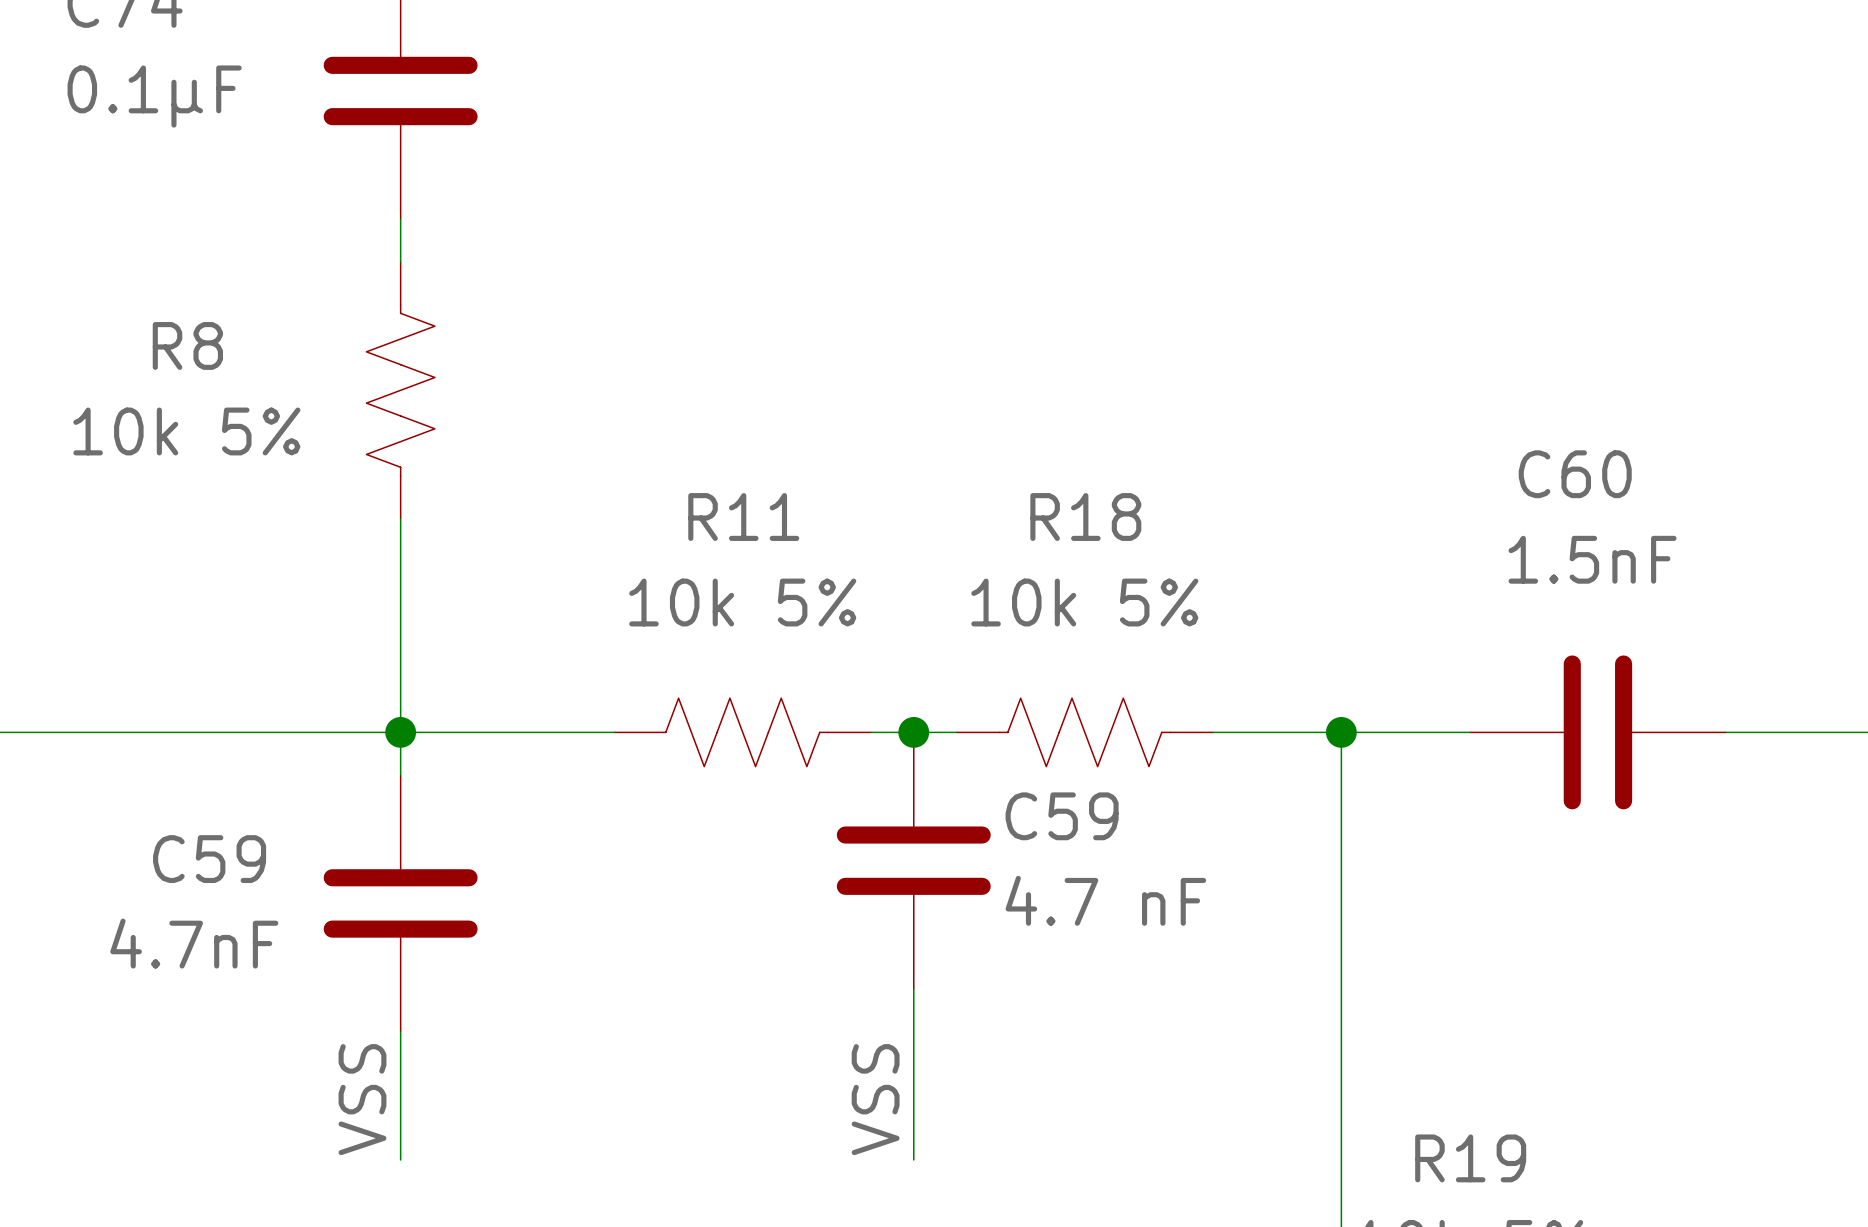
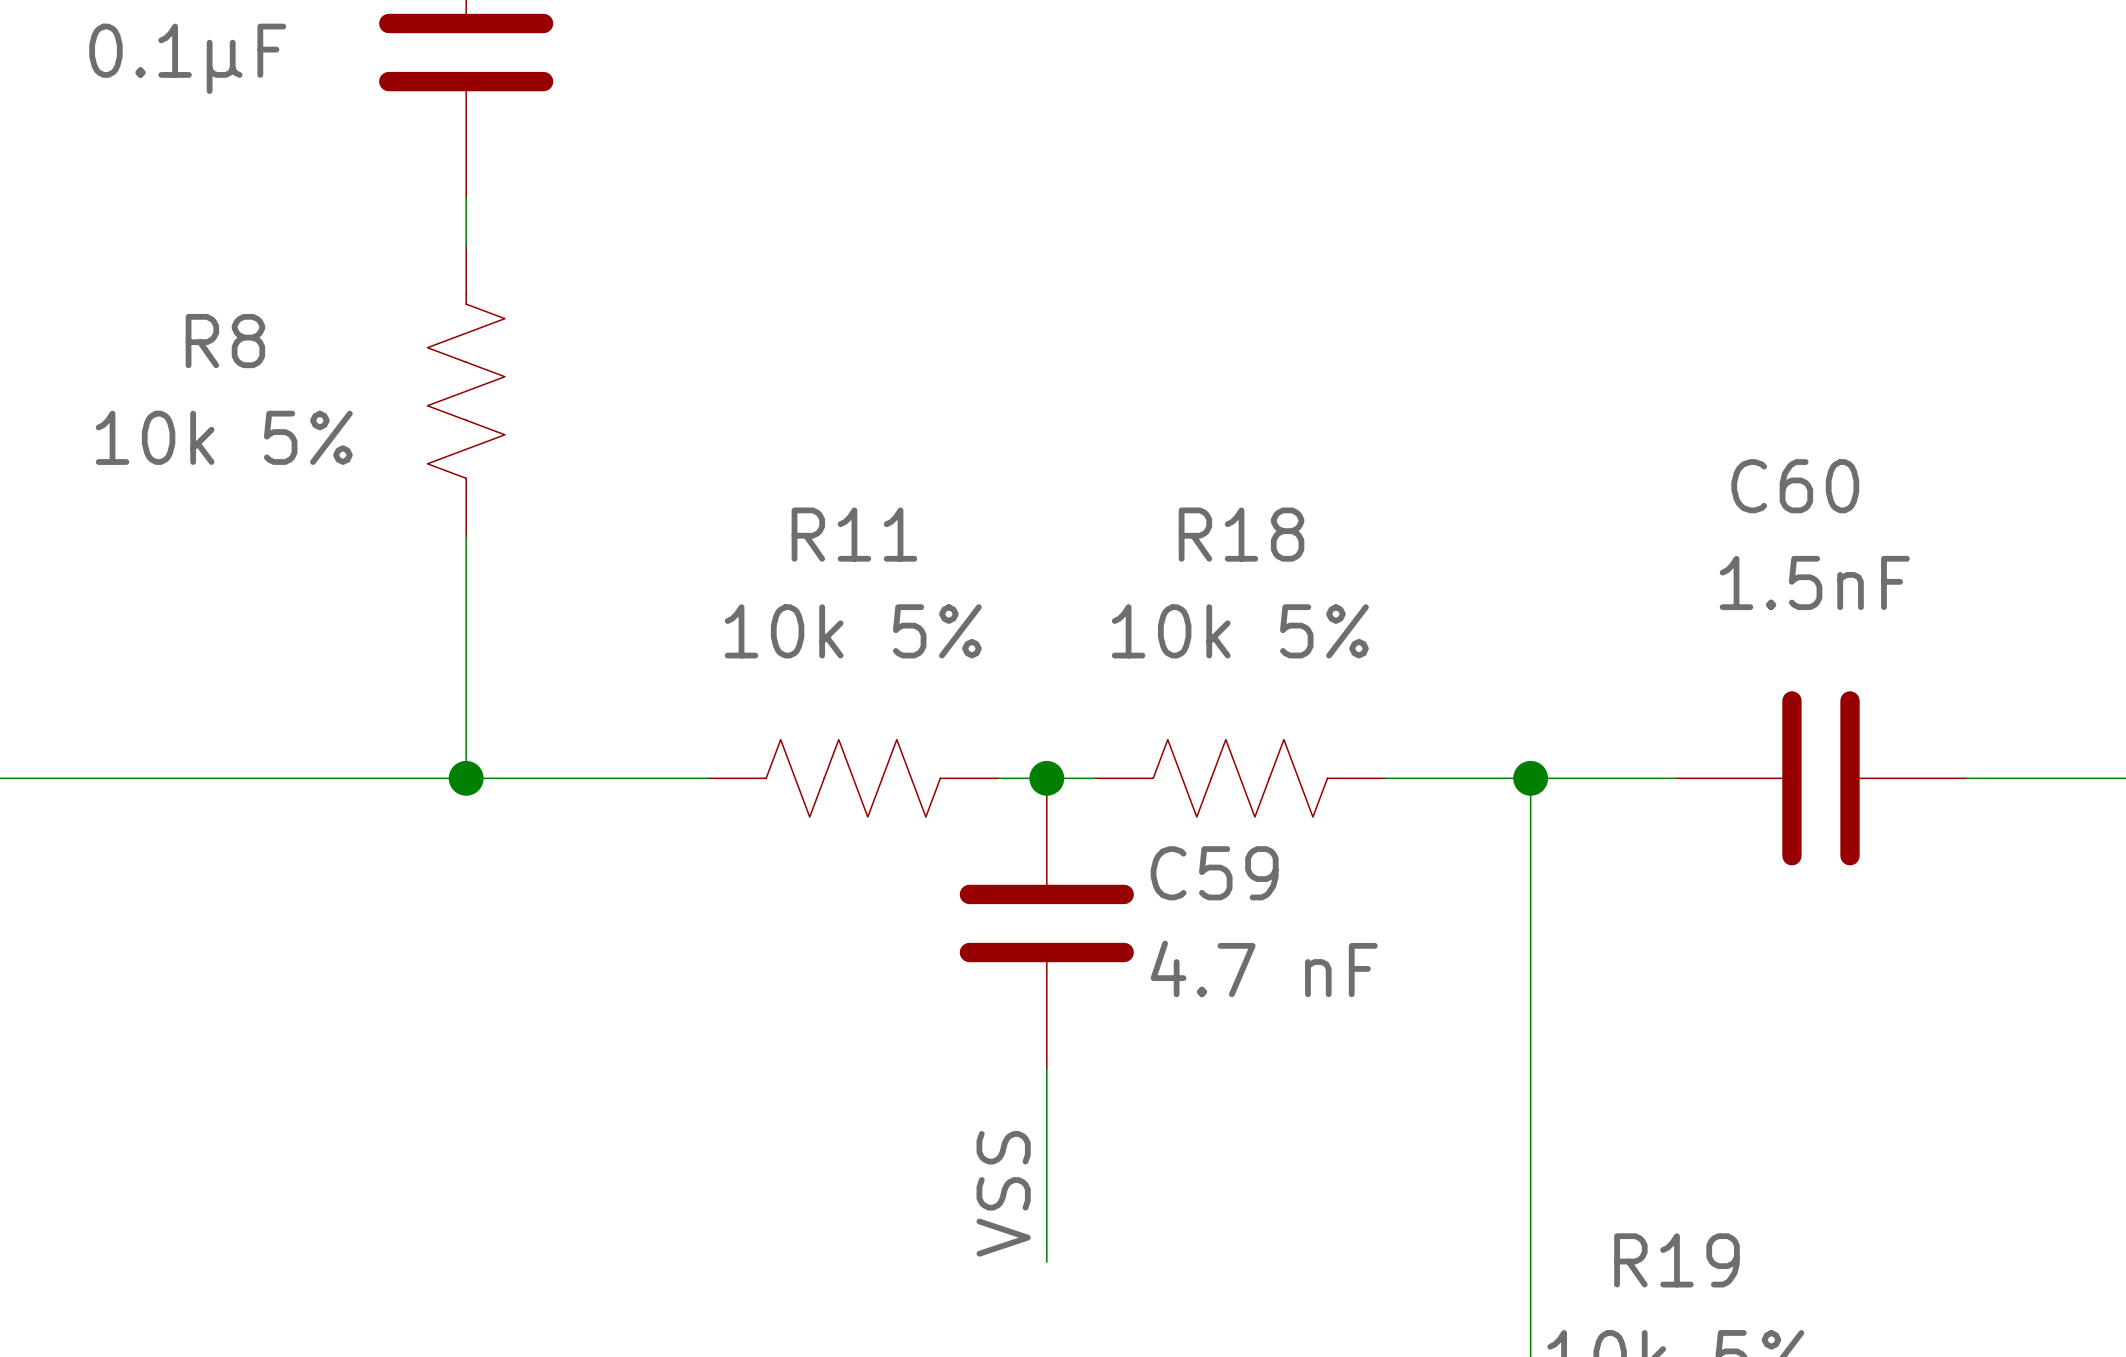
wire: (400, 732) (400, 775) -> none
C59: 4.7nF (400, 903) -> none
wire: (400, 1031) (400, 1160) -> none
label: VSS (362, 1099) -> none

